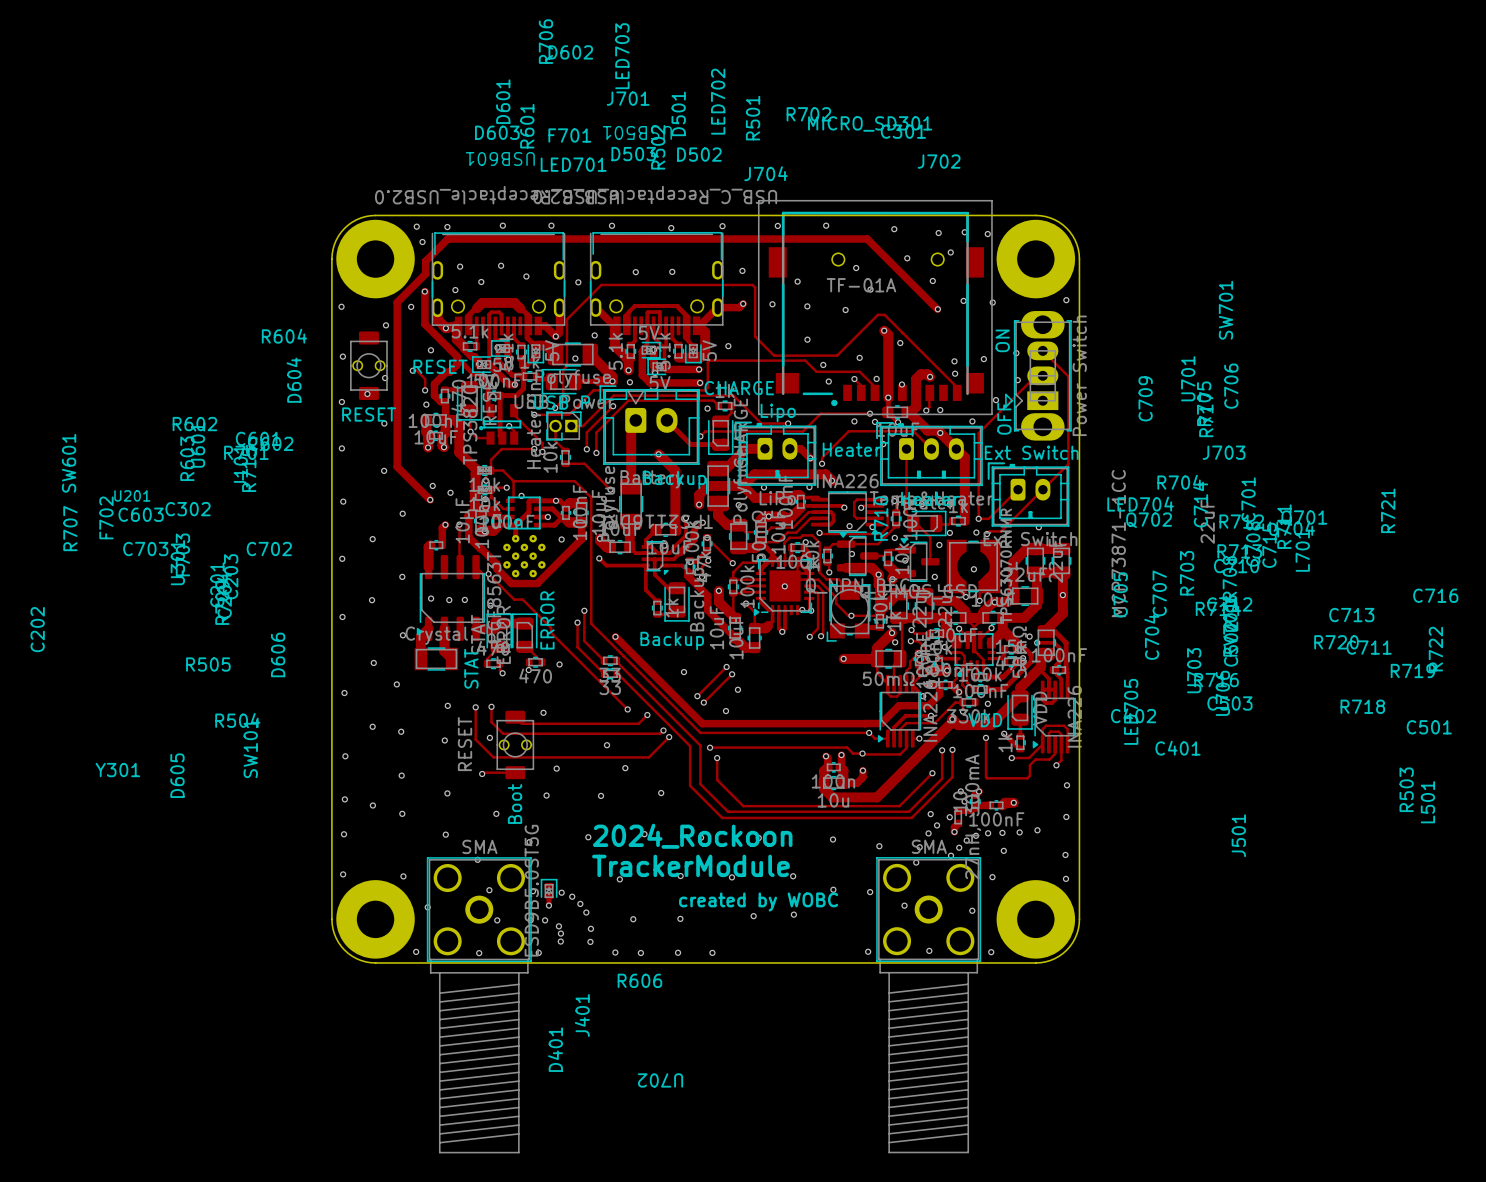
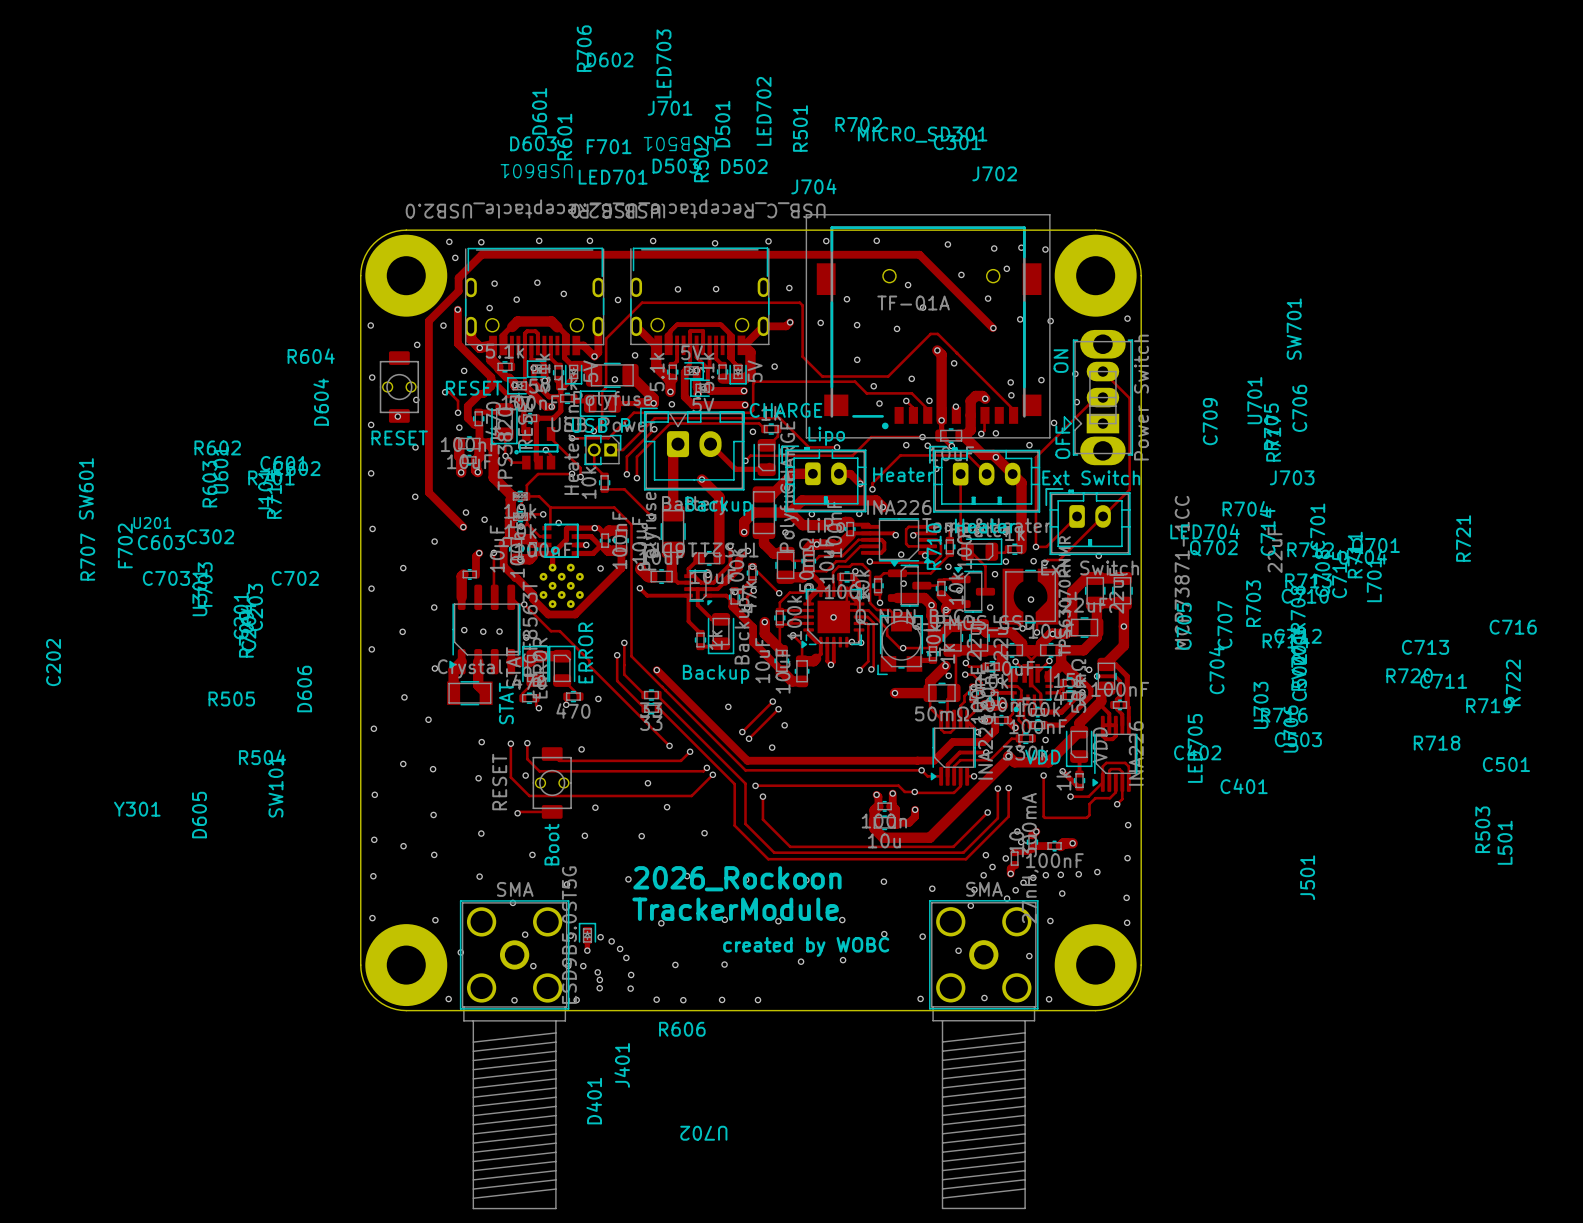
text: 2024_Rockoon (692, 836) -> 2026_Rockoon (737, 878)

